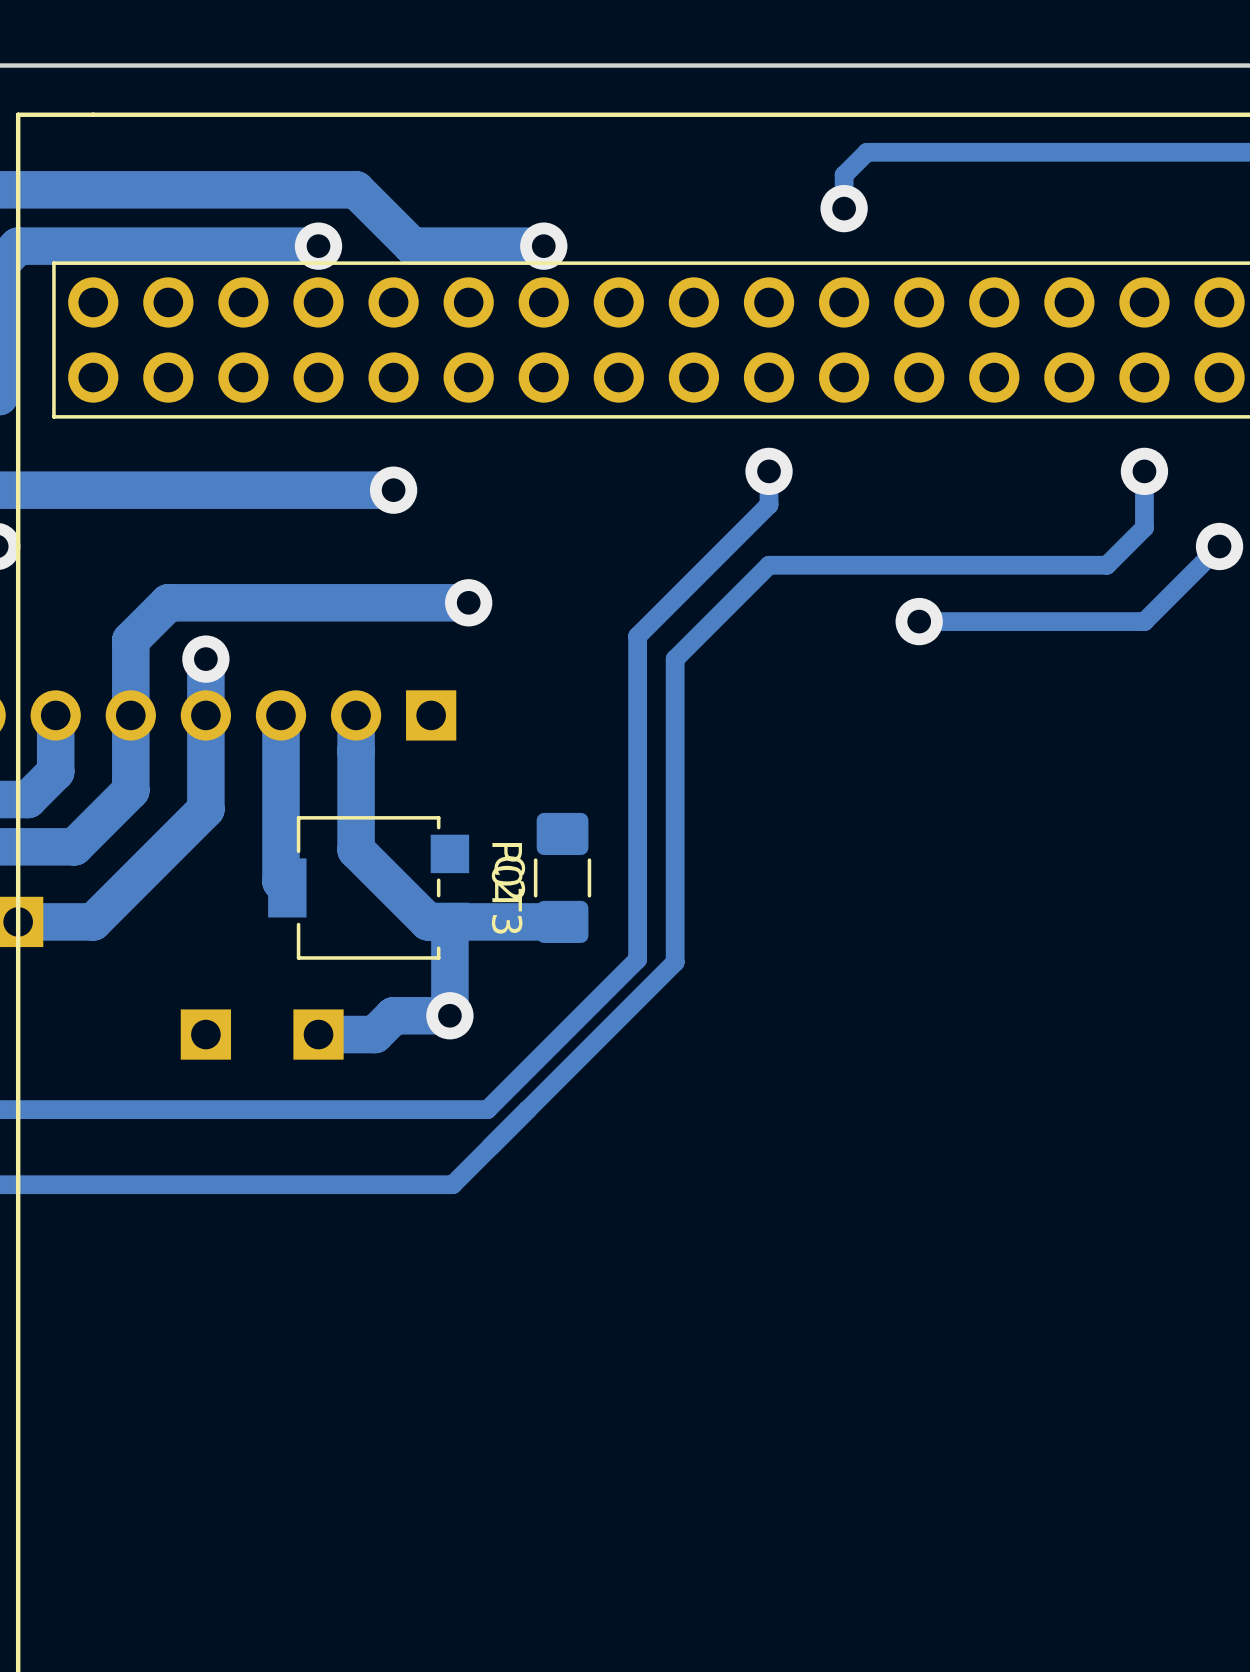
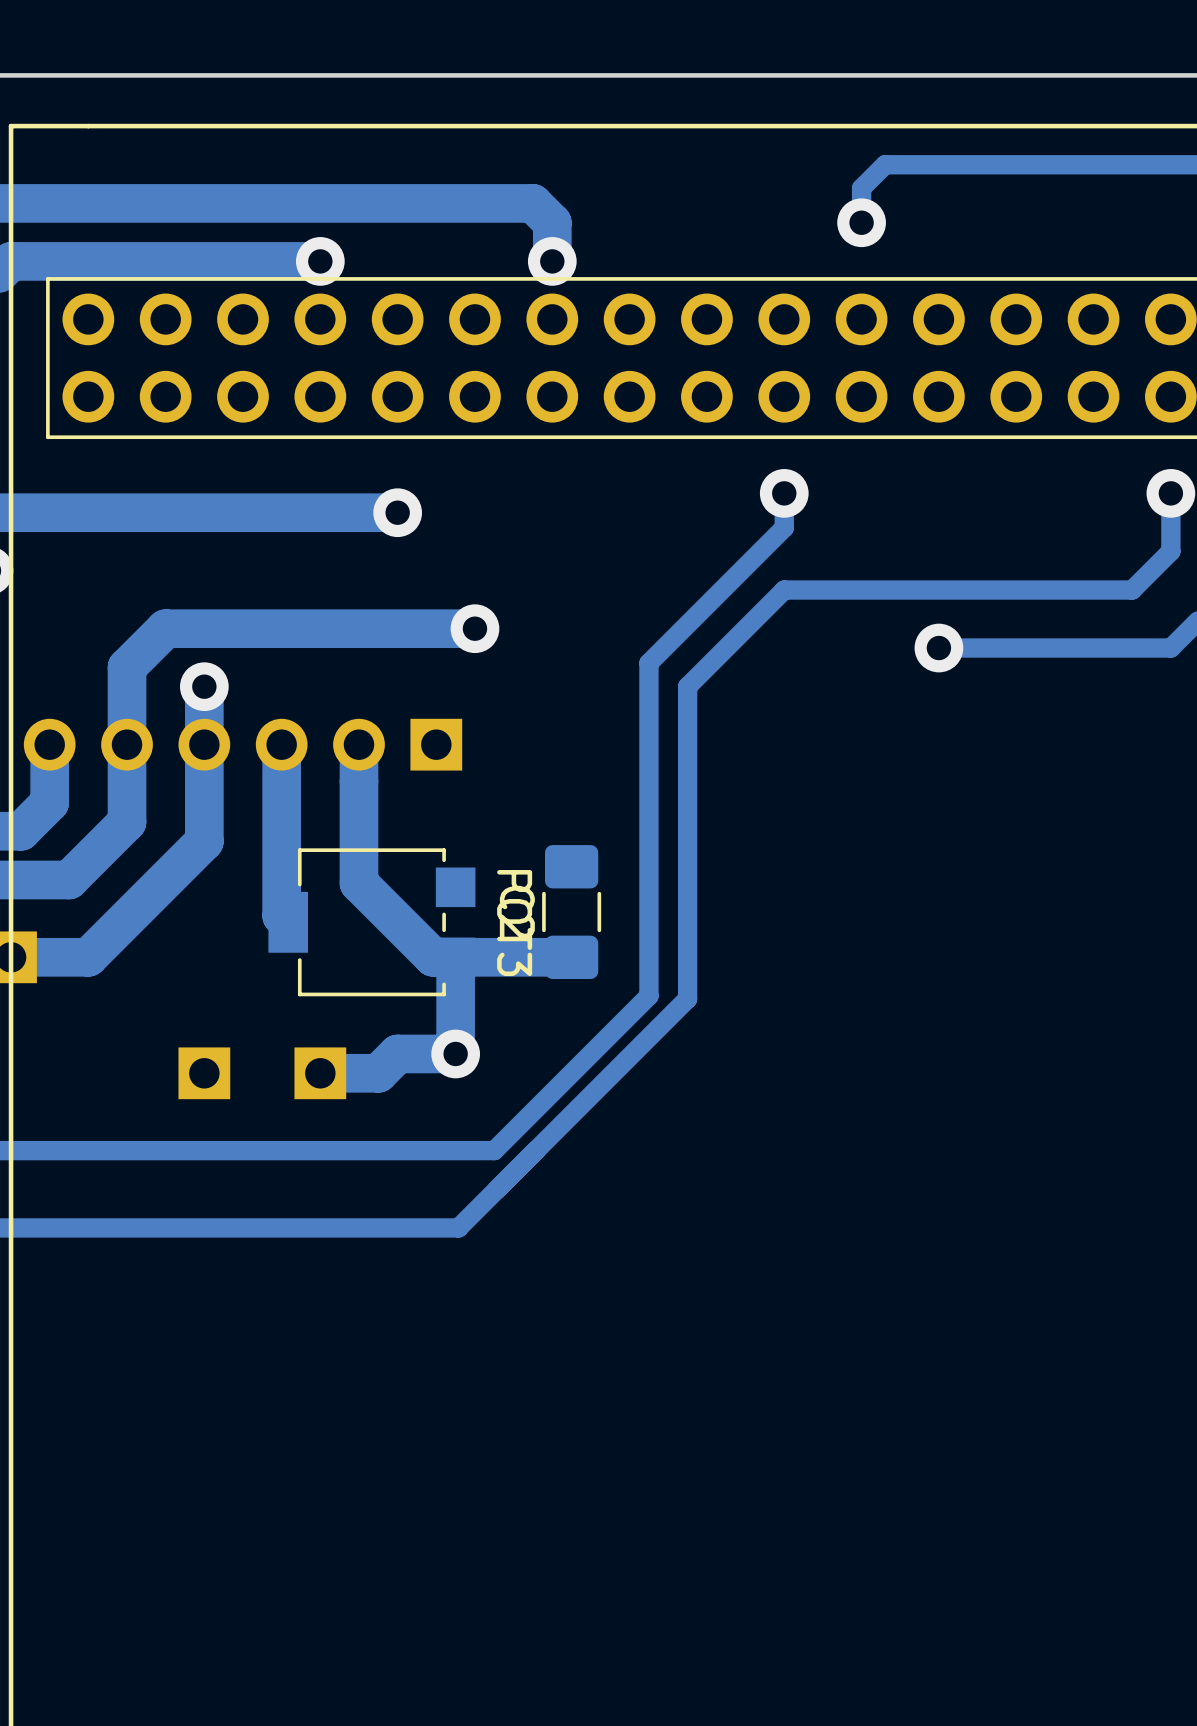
track: (356, 189) (412, 246) (543, 246) -> (358, 203) (532, 203) (552, 222) (552, 261)

